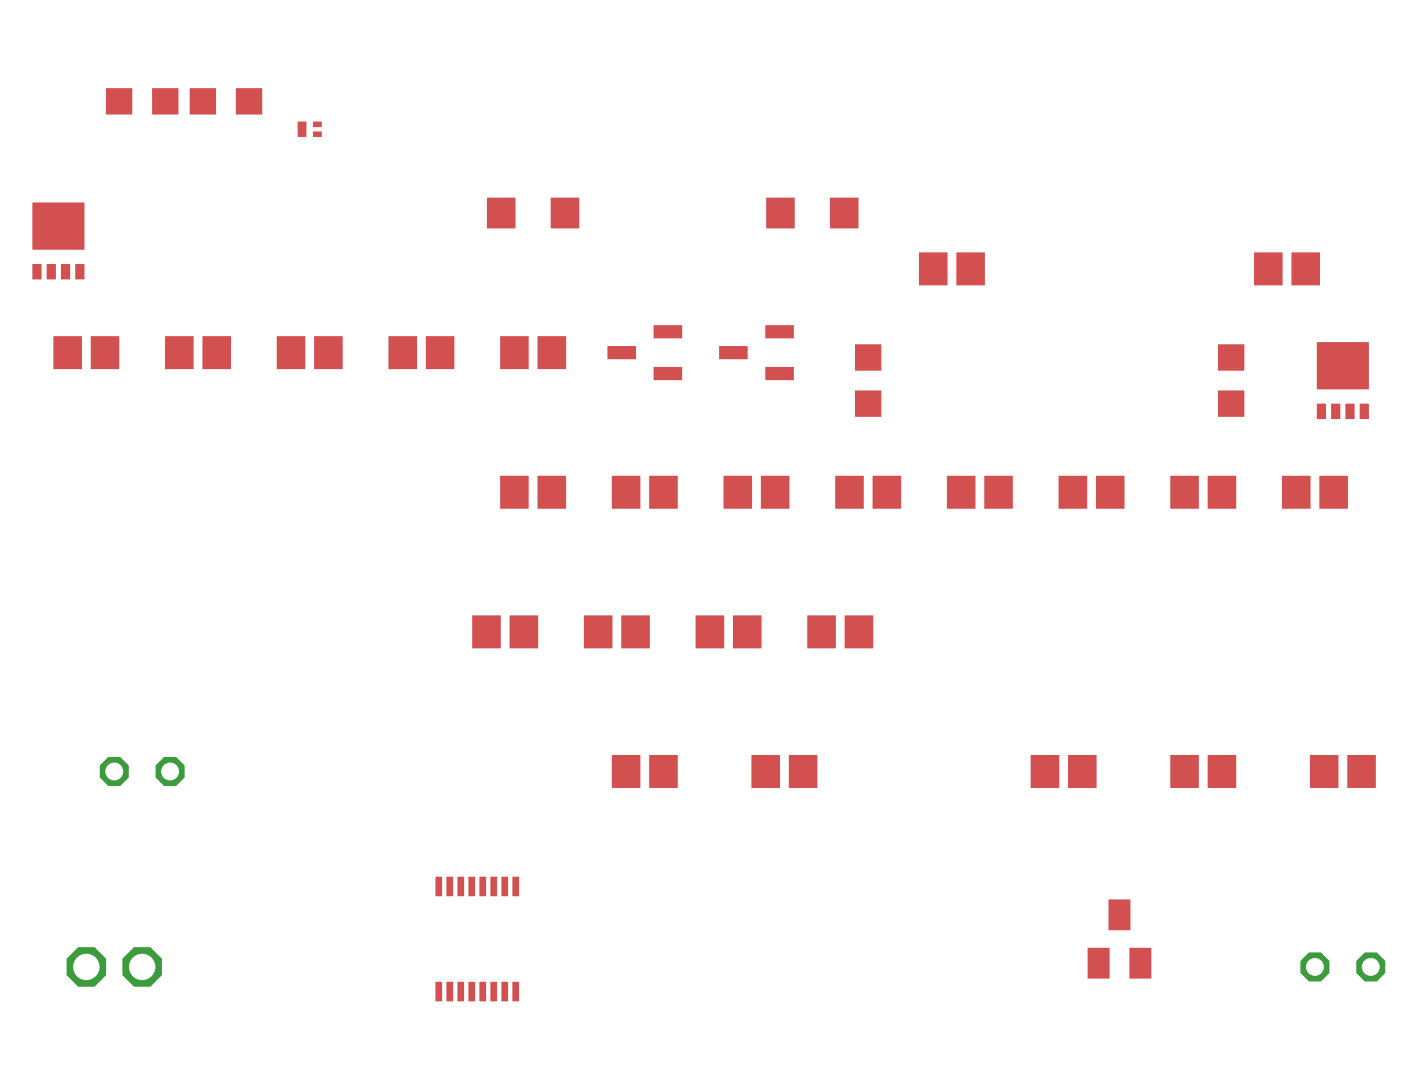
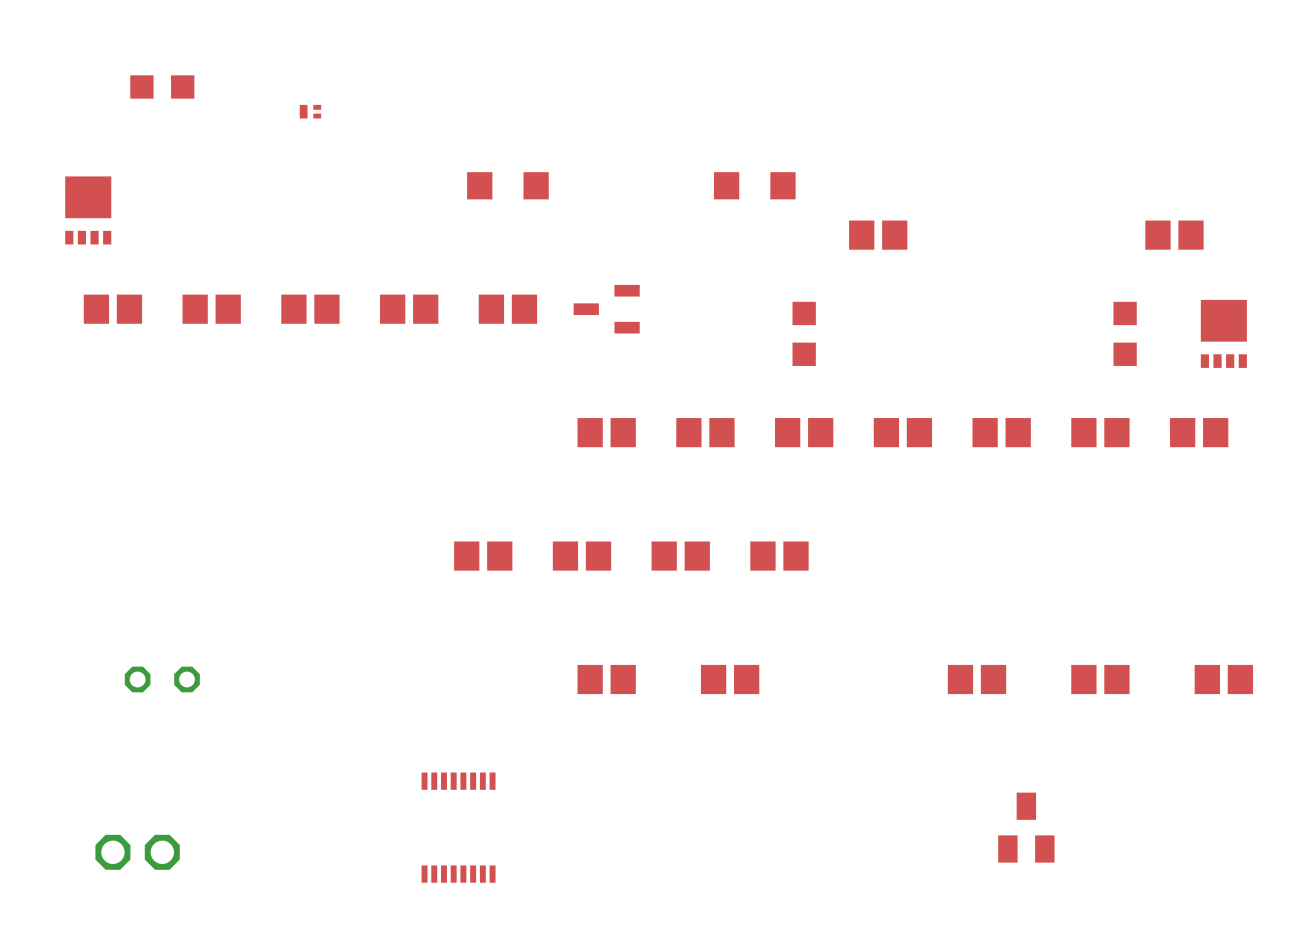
part: (225, 101) -> none
part: (756, 352) -> none
part: (533, 492) -> none
part: (1342, 966) -> none

